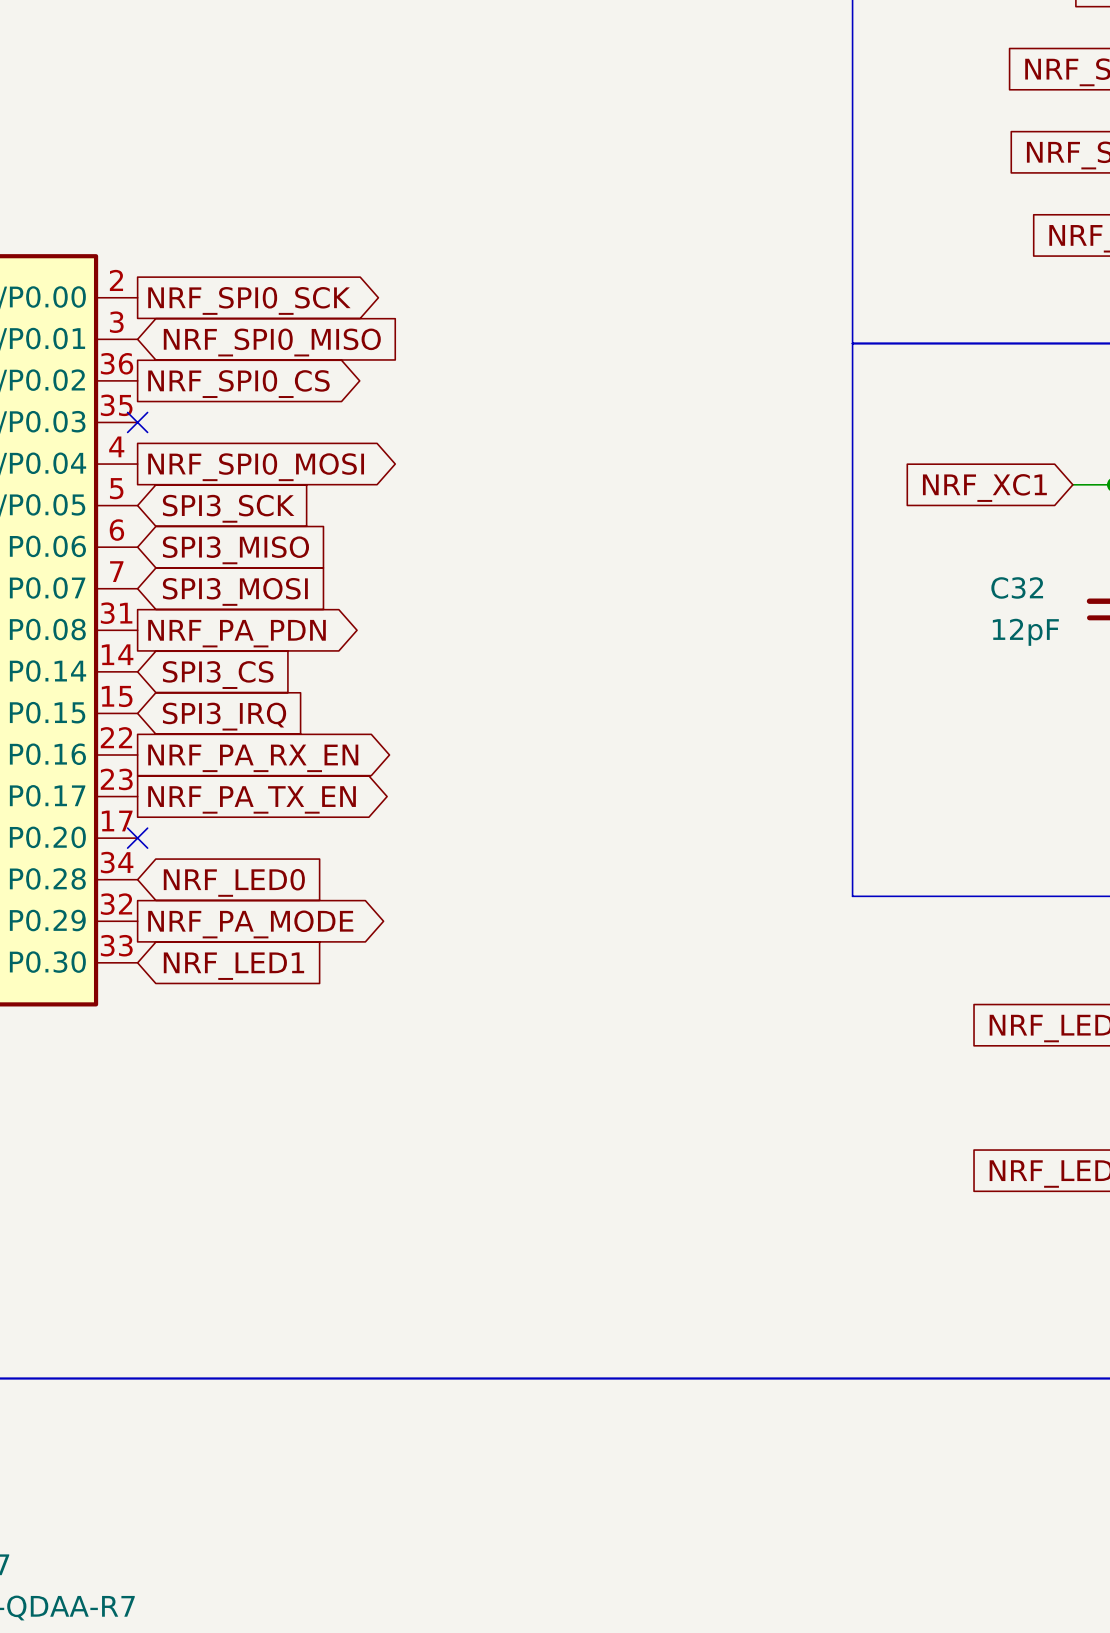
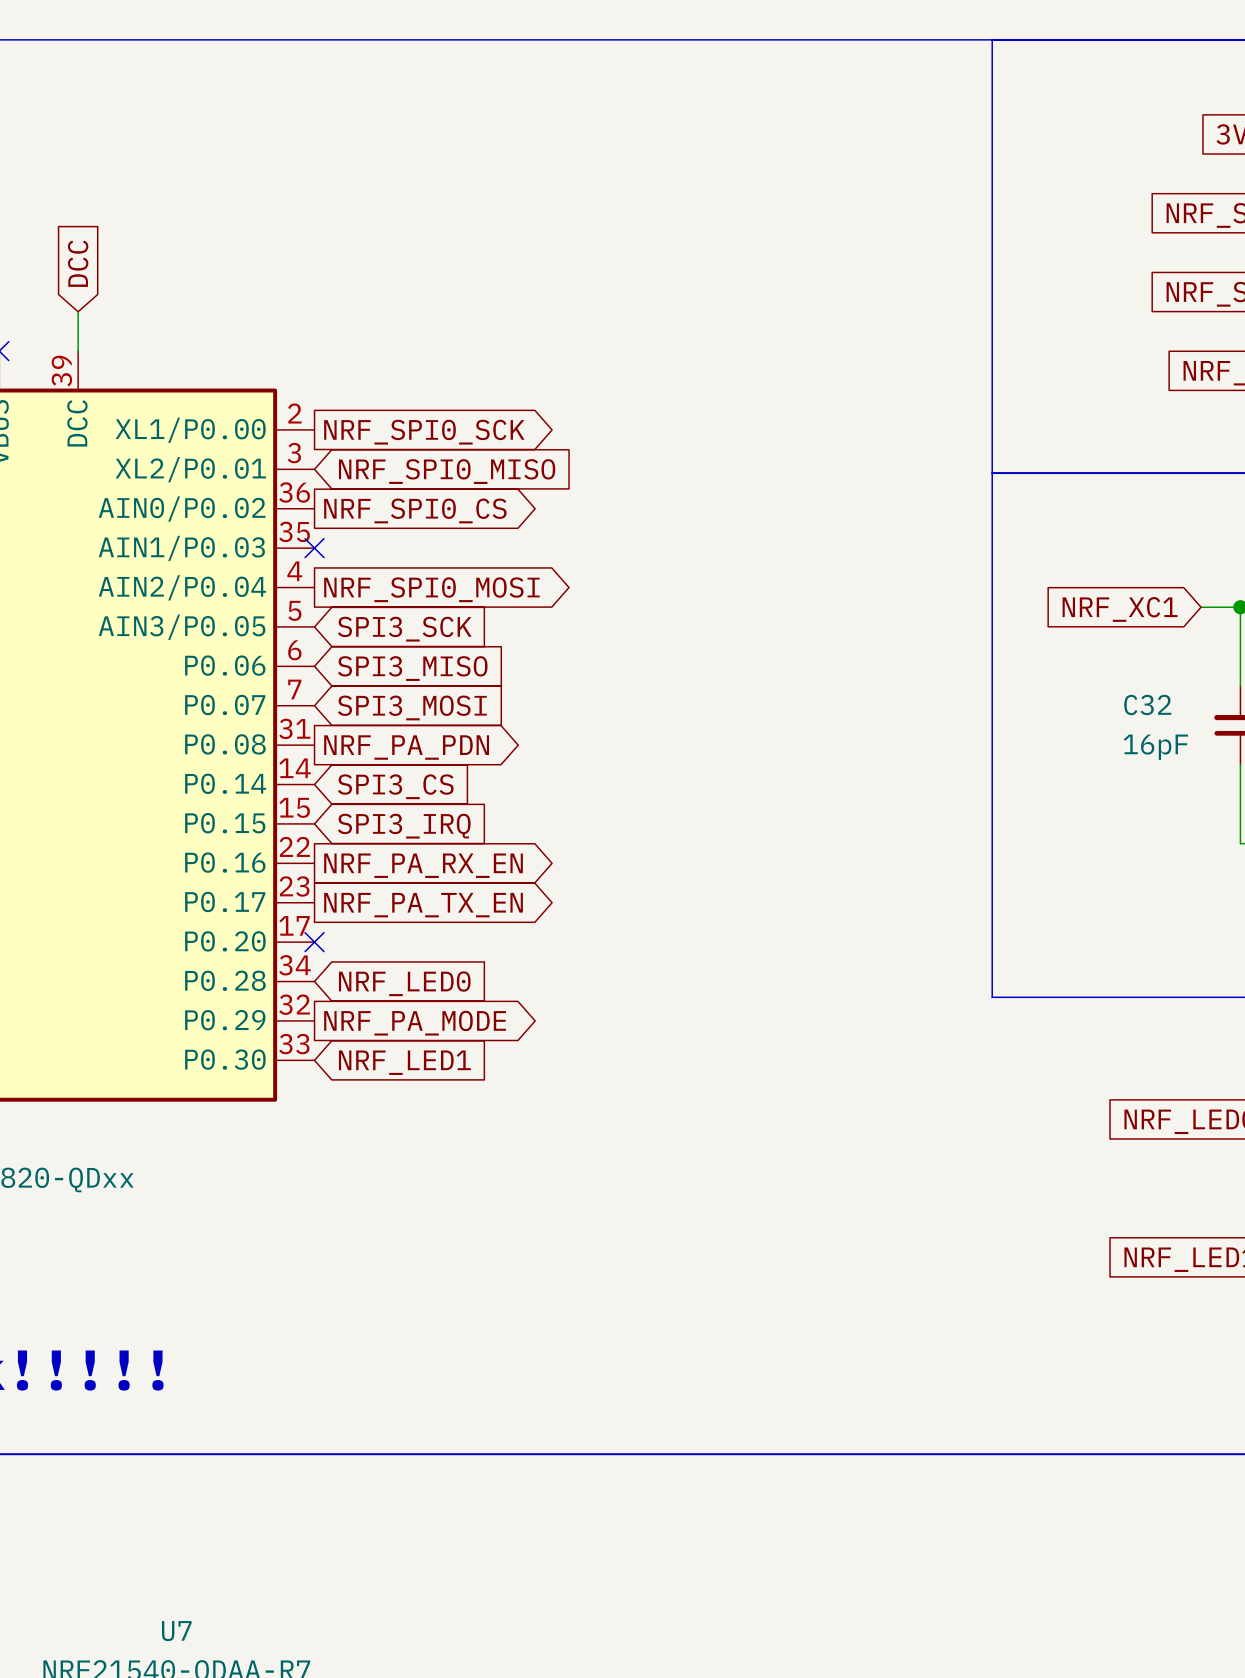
C32 value: 12pF (1025, 632) -> 16pF (1155, 747)

